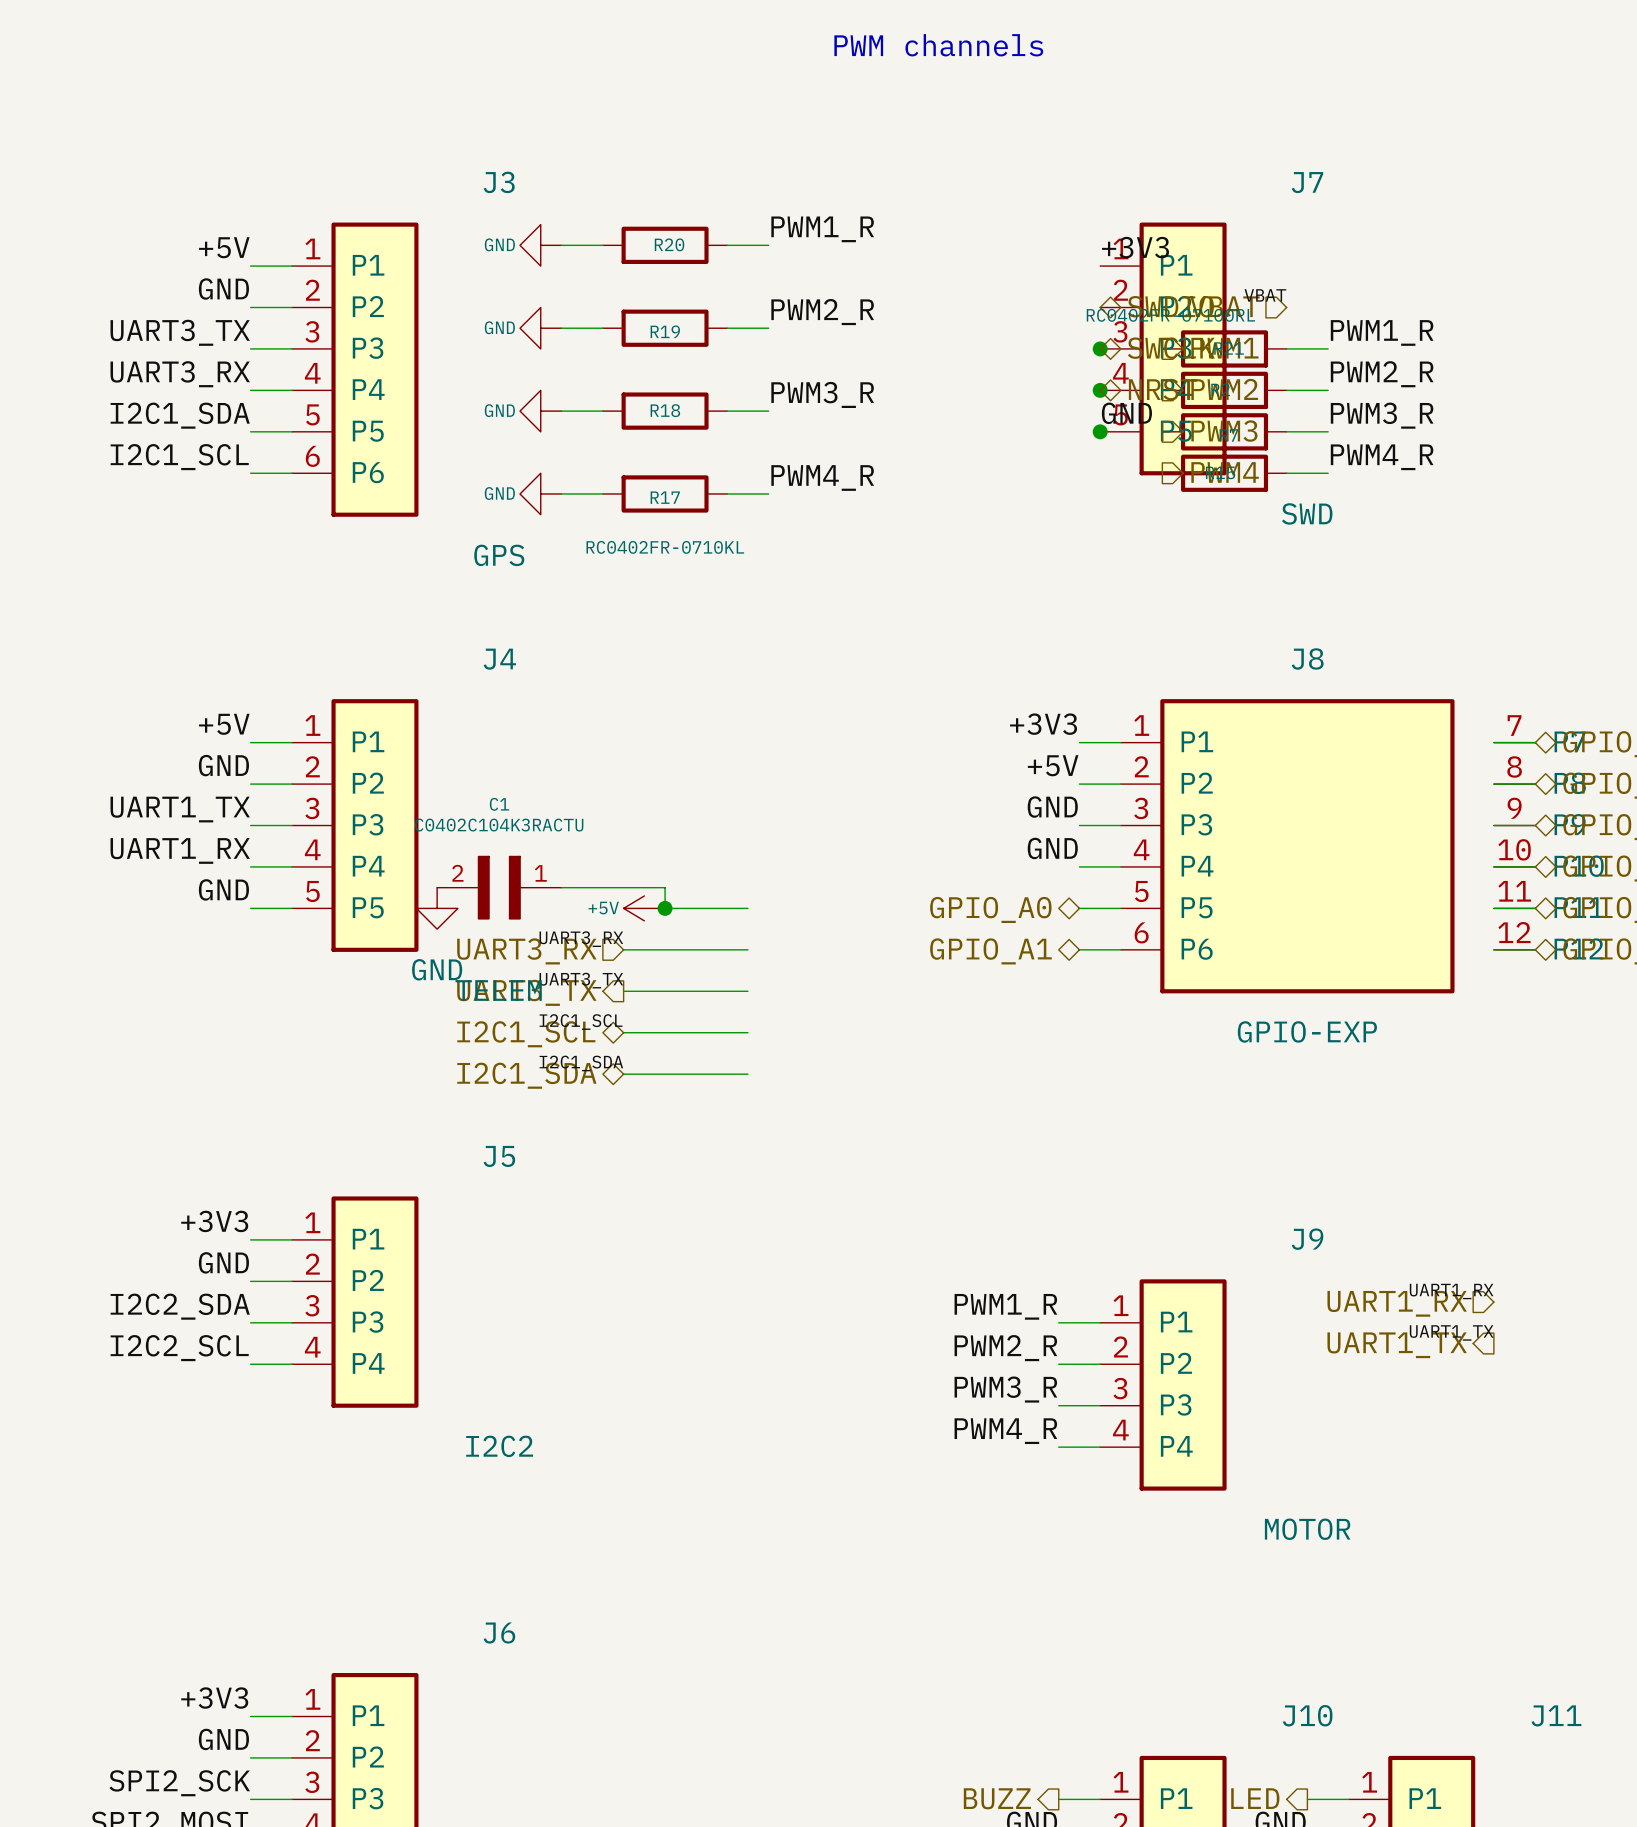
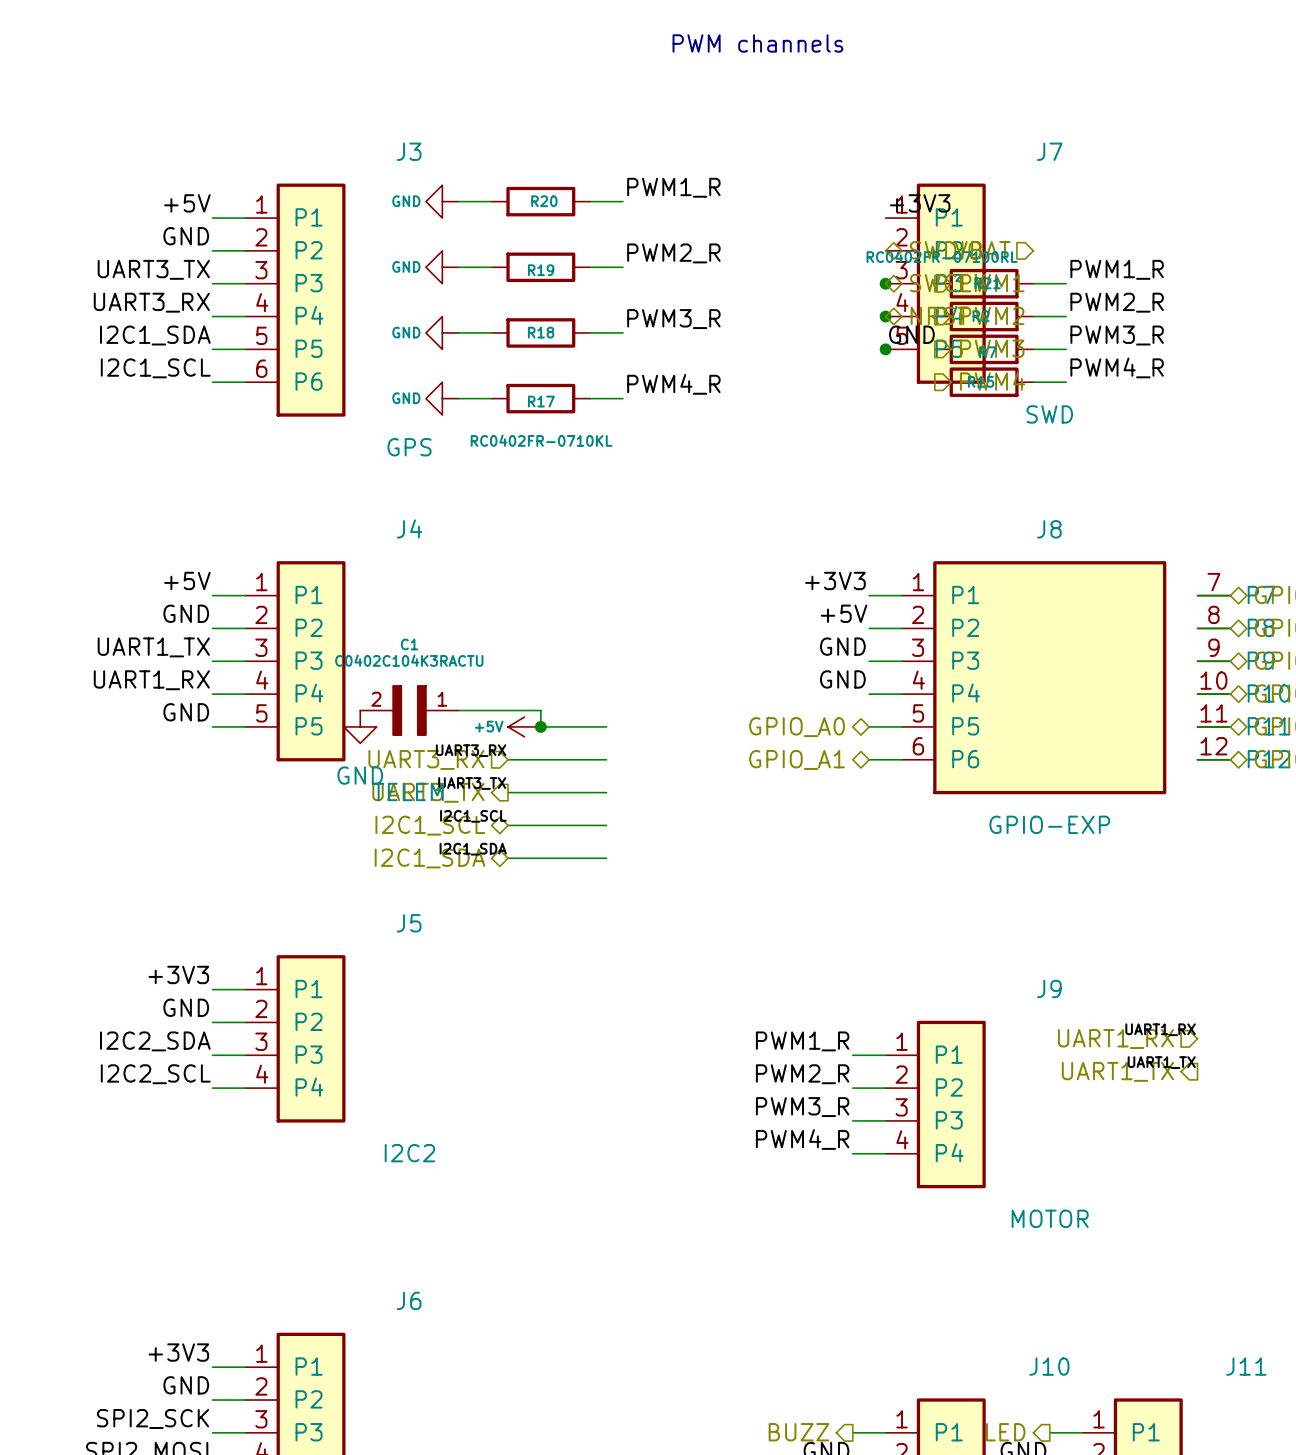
label: VBAT (1265, 295) -> none

